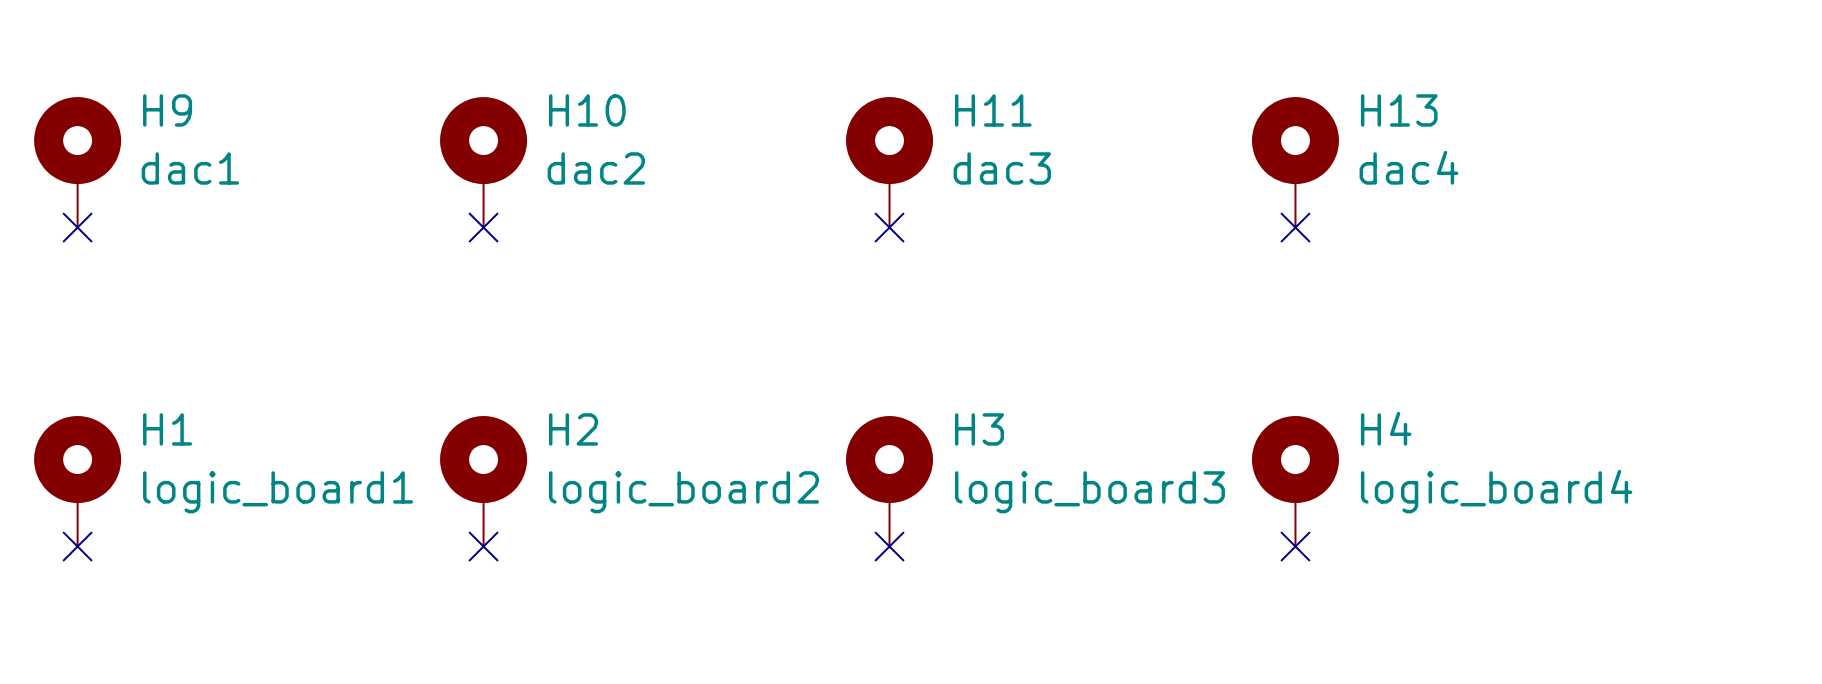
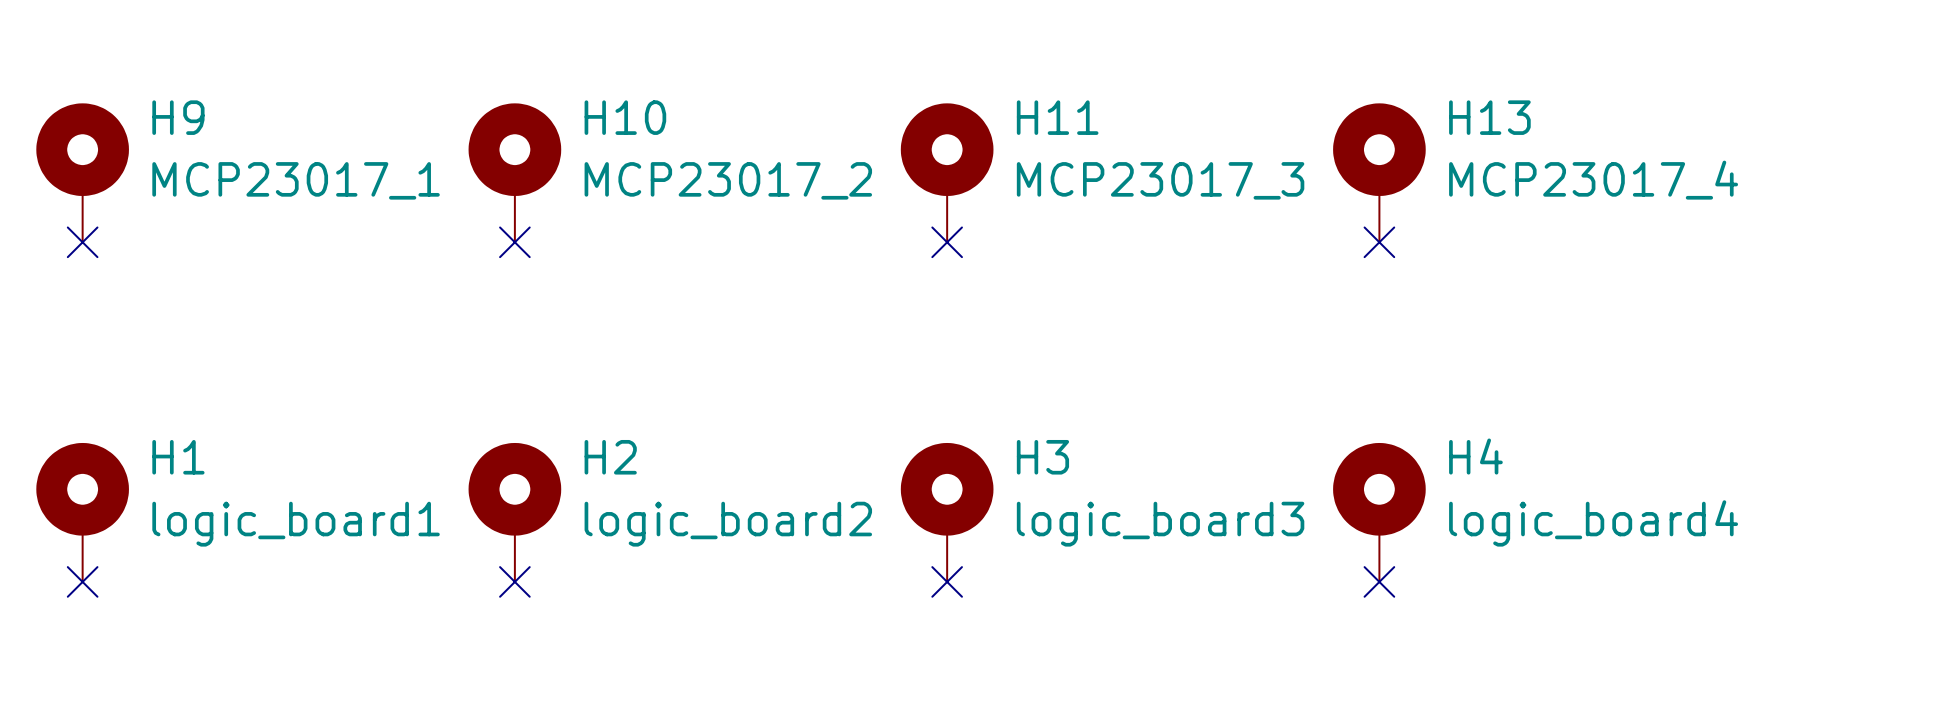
H13 value: dac4 (1408, 167) -> MCP23017_4 (1593, 180)
H9 value: dac1 (190, 168) -> MCP23017_1 (296, 180)
H10 value: dac2 (596, 168) -> MCP23017_2 (728, 180)
H11 value: dac3 (1002, 168) -> MCP23017_3 (1160, 180)

